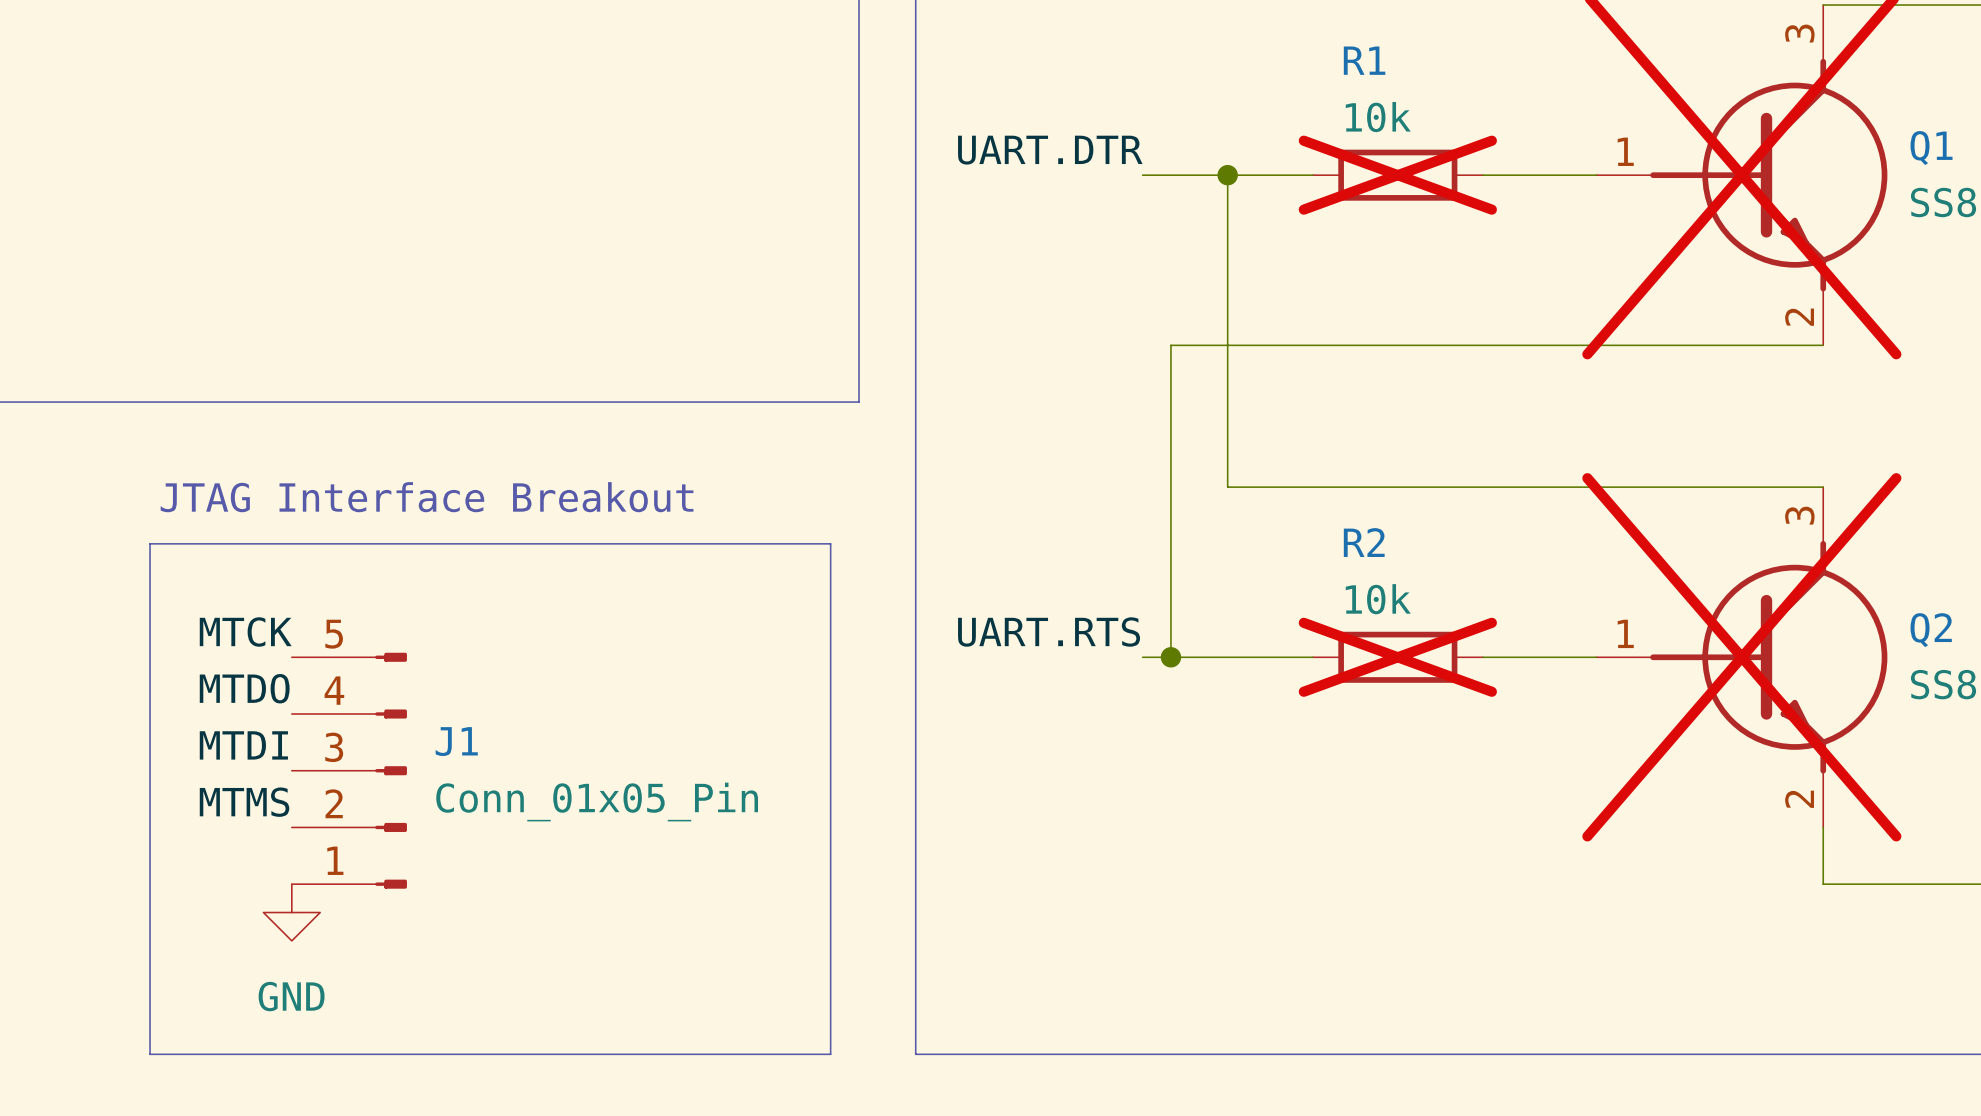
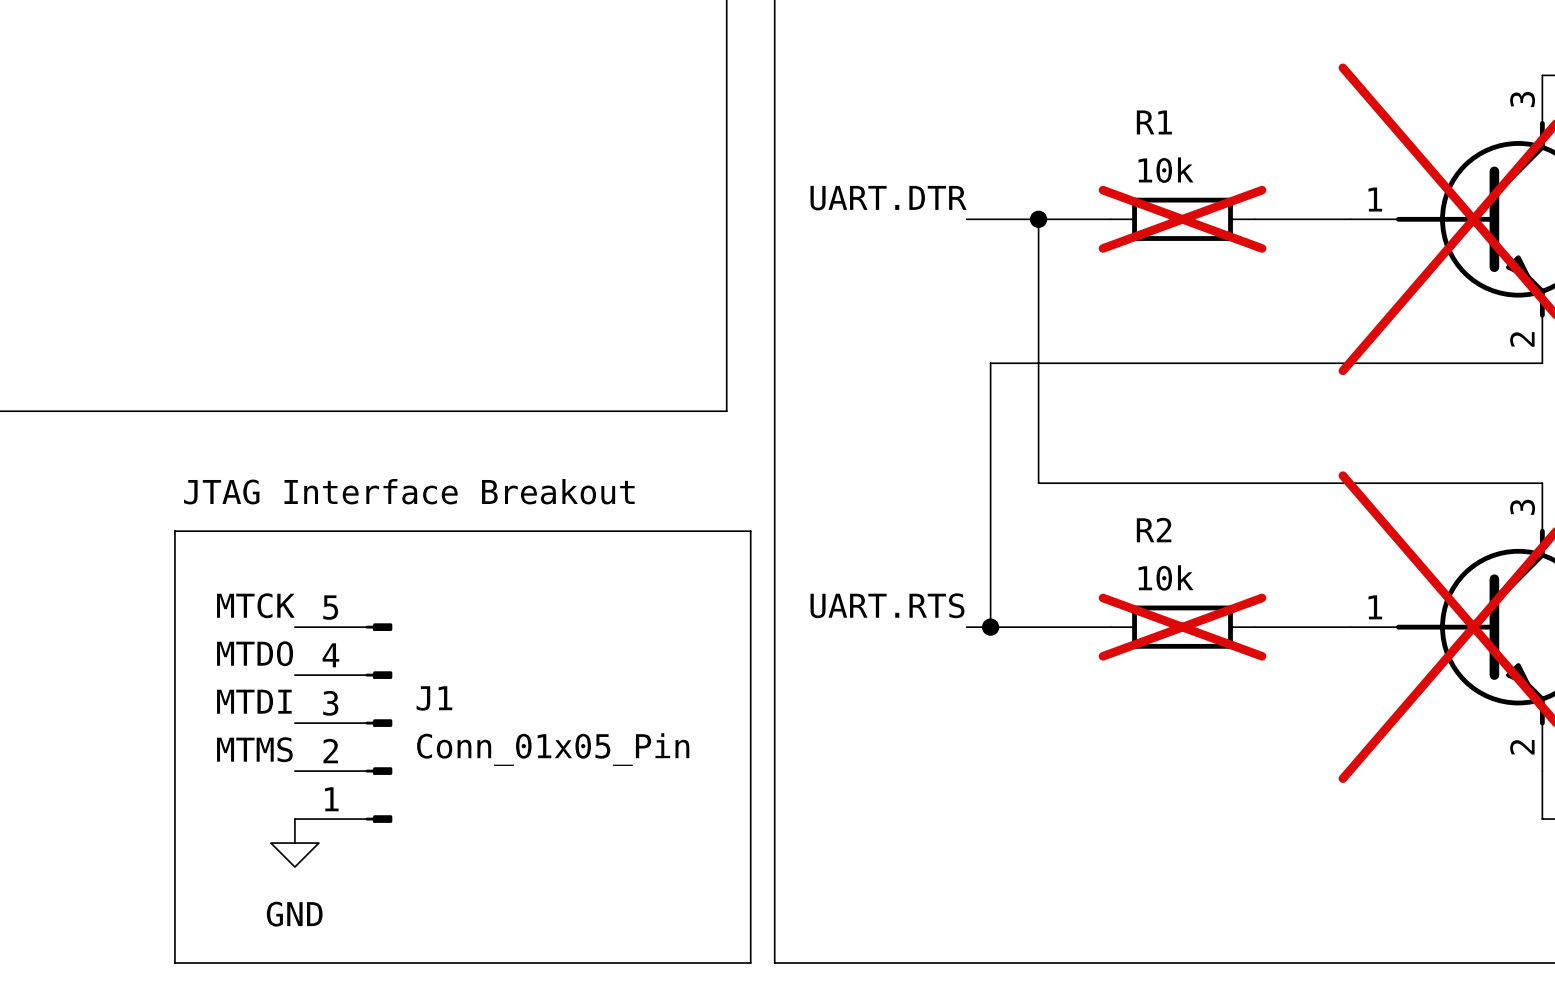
text position: JTAG Interface Breakout (427, 497) -> JTAG Interface Breakout (409, 491)
line: (206, 543) (150, 543) (150, 1054) (206, 1054) -> (174, 531) (174, 963)
line: (830, 543) (830, 1054) -> (702, 531) (750, 531) (750, 963) (702, 963)
label position: MTCK (245, 632) -> MTCK (255, 605)
label position: MTDO (244, 688) -> MTDO (255, 653)
label position: MTDI (243, 745) -> MTDI (254, 701)
J1 position: (349, 770) -> (343, 723)
label position: MTMS (244, 802) -> MTMS (254, 749)
power symbol position: GND (291, 912) -> GND (294, 843)

